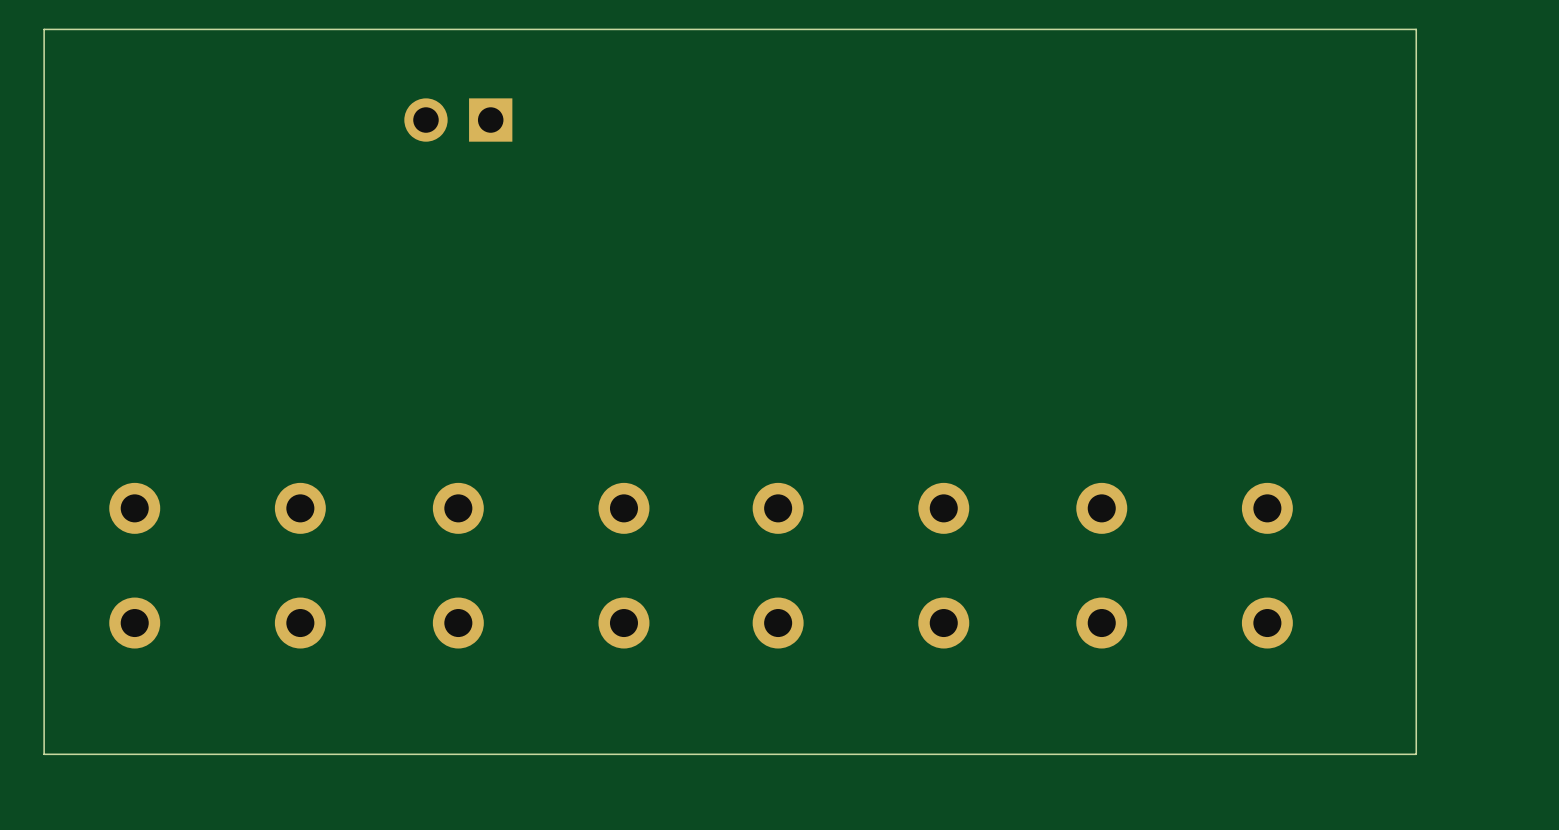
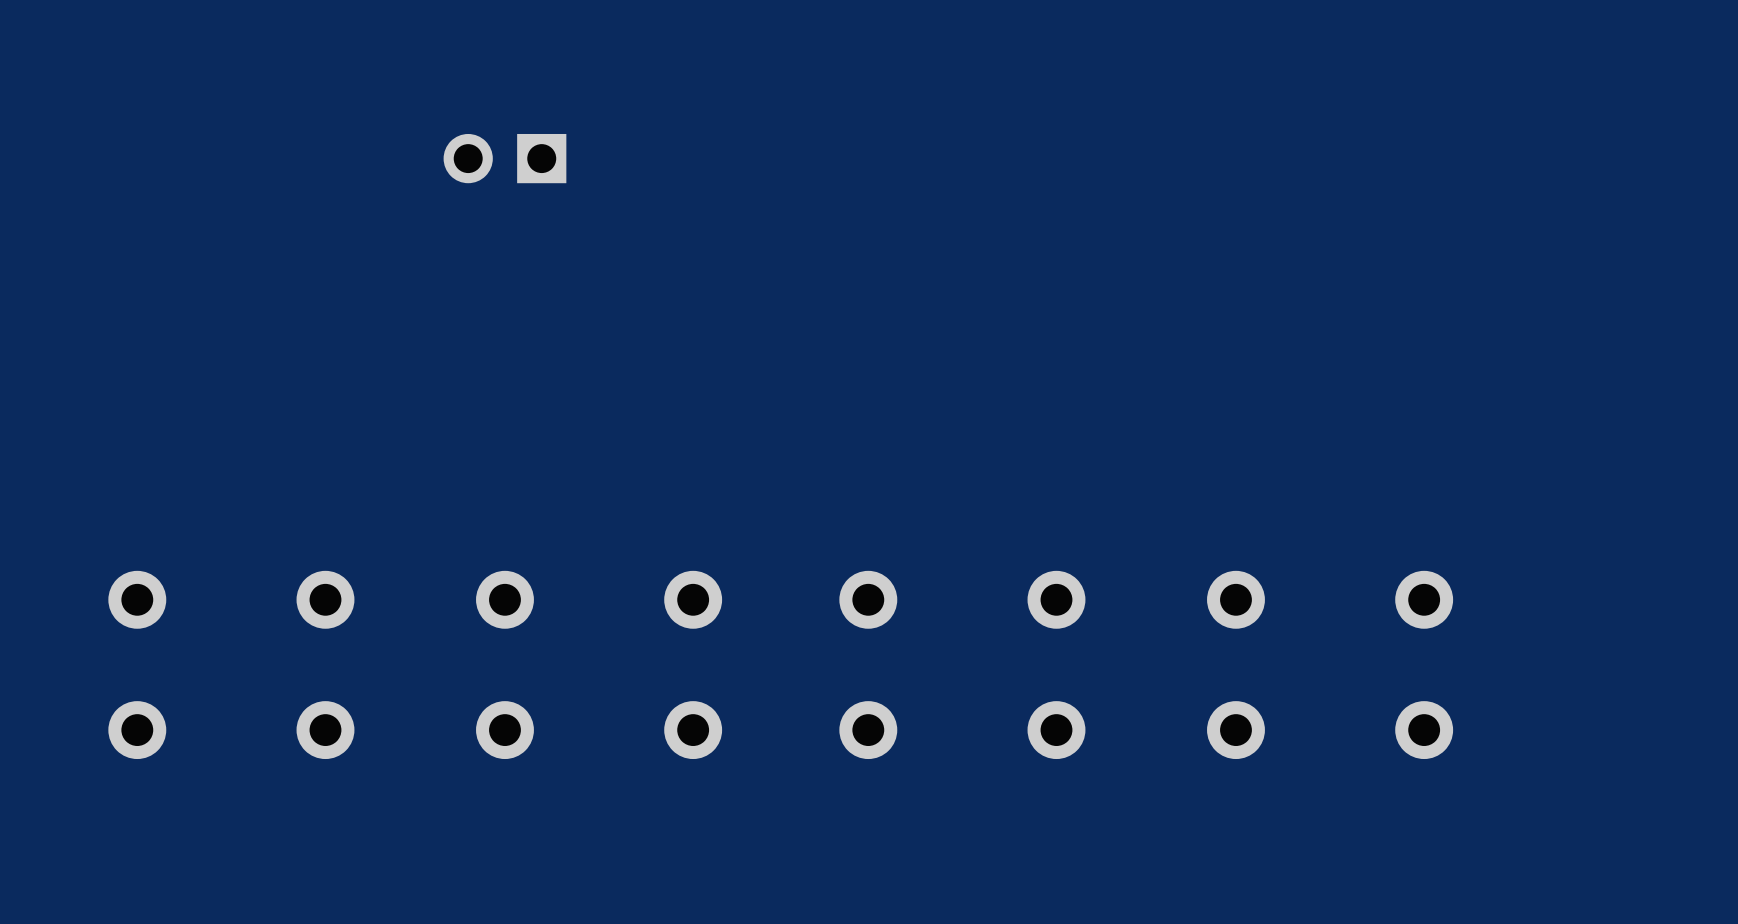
board edge: (1416, 29) (1416, 754) (44, 754) (44, 29) (1416, 29) -> none

